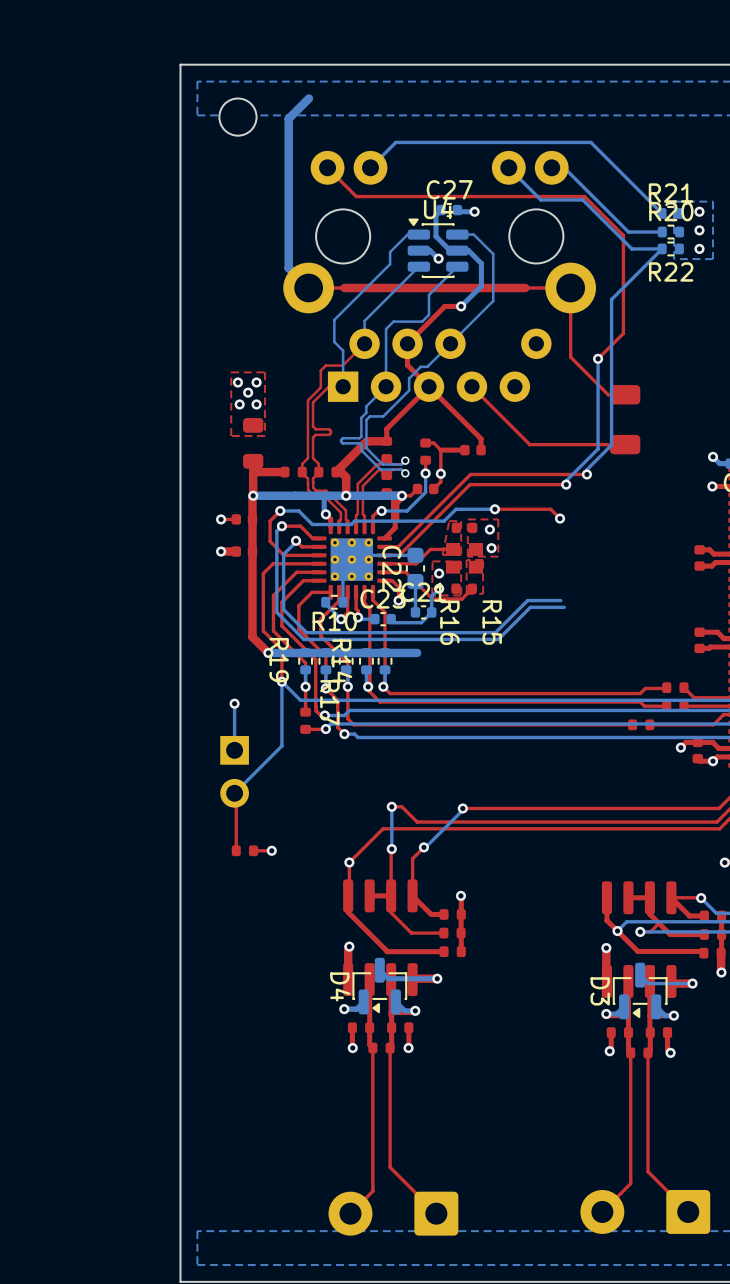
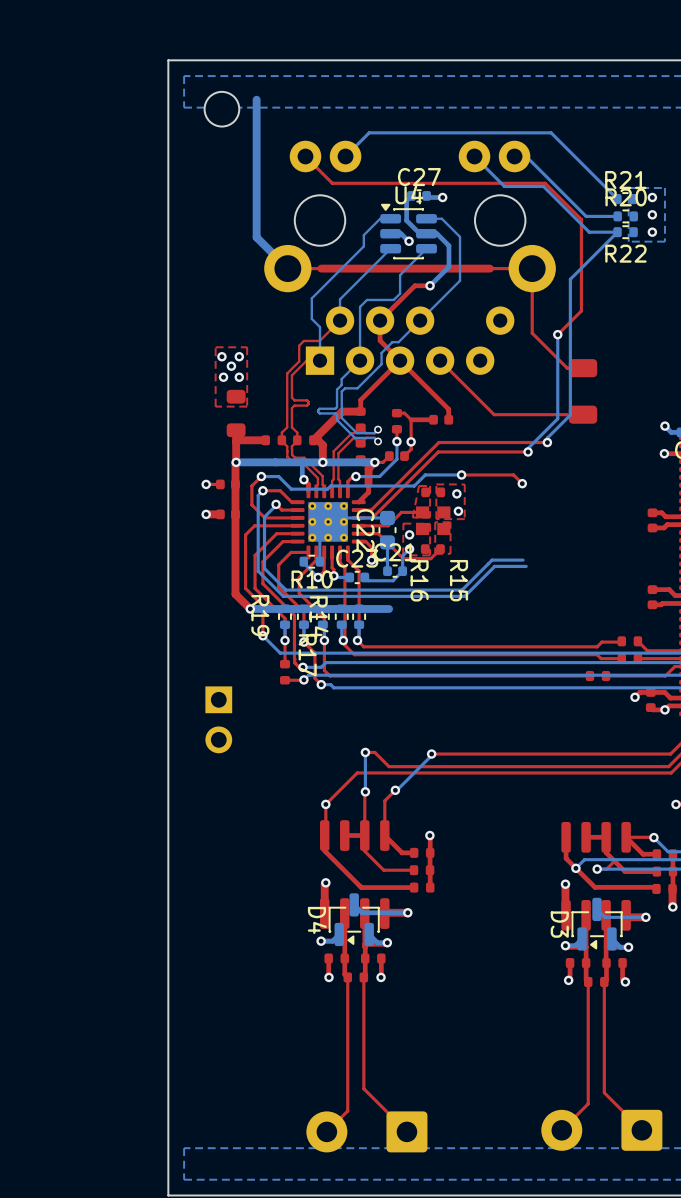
bottom track: (308, 98) (288, 118) (288, 268) -> (256, 99) (256, 237) (269, 249)
bottom track: (281, 681) (281, 745) (234, 793) -> none
bottom track: (234, 703) (234, 750) -> none
via: (234, 703) -> none
top track: (234, 793) (236, 794) (236, 850) -> none
part: (244, 850) -> none
top track: (271, 850) (253, 850) -> none
via: (271, 850) -> none

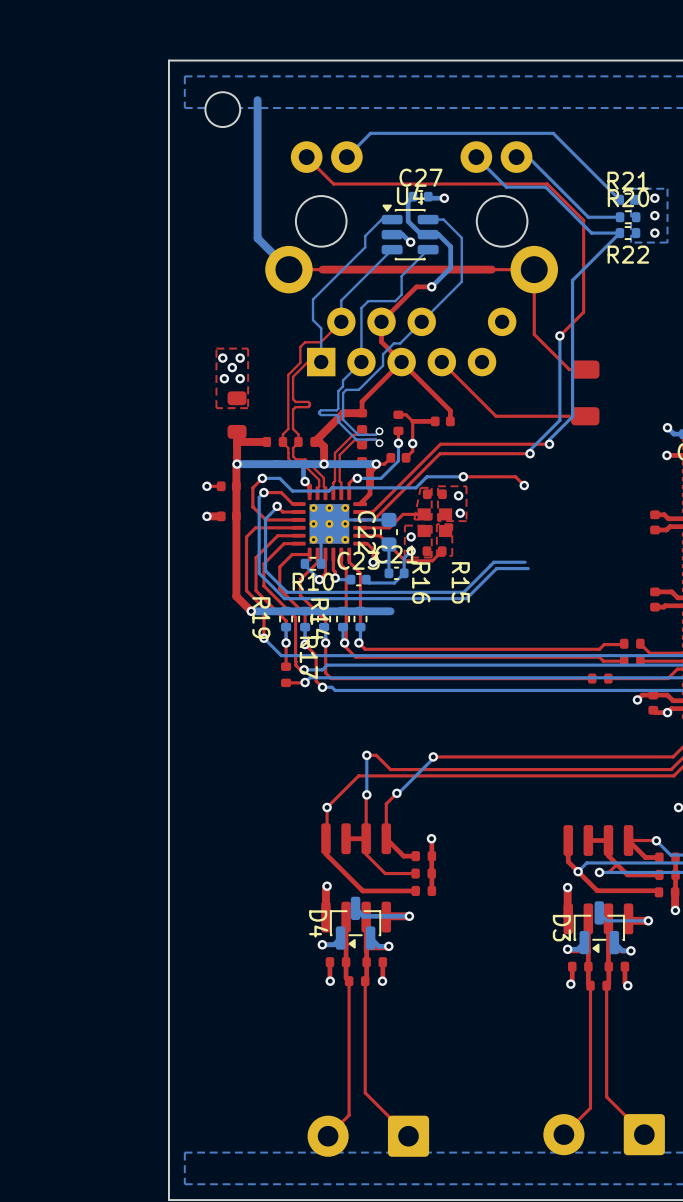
part: (218, 719) -> none

